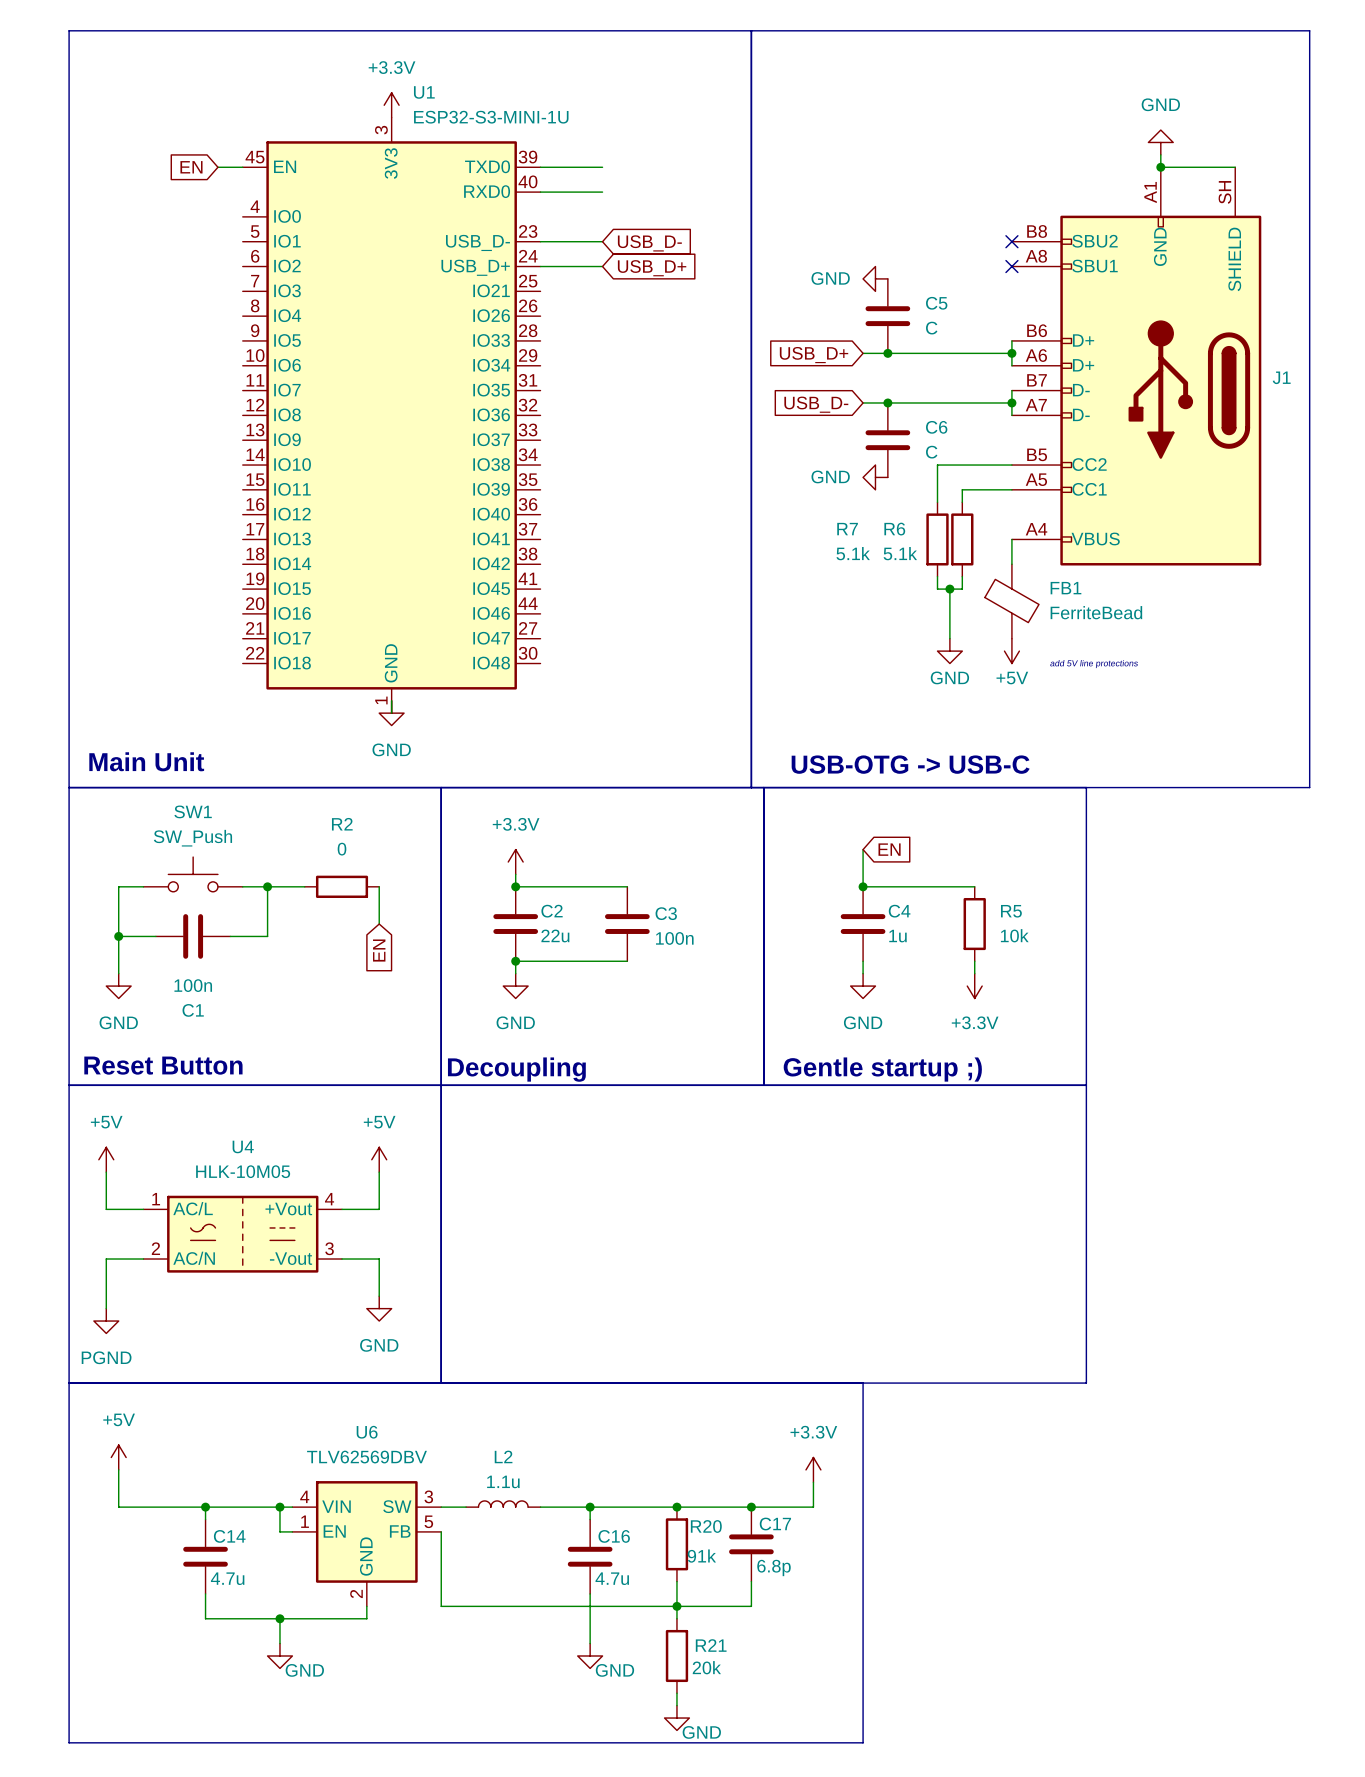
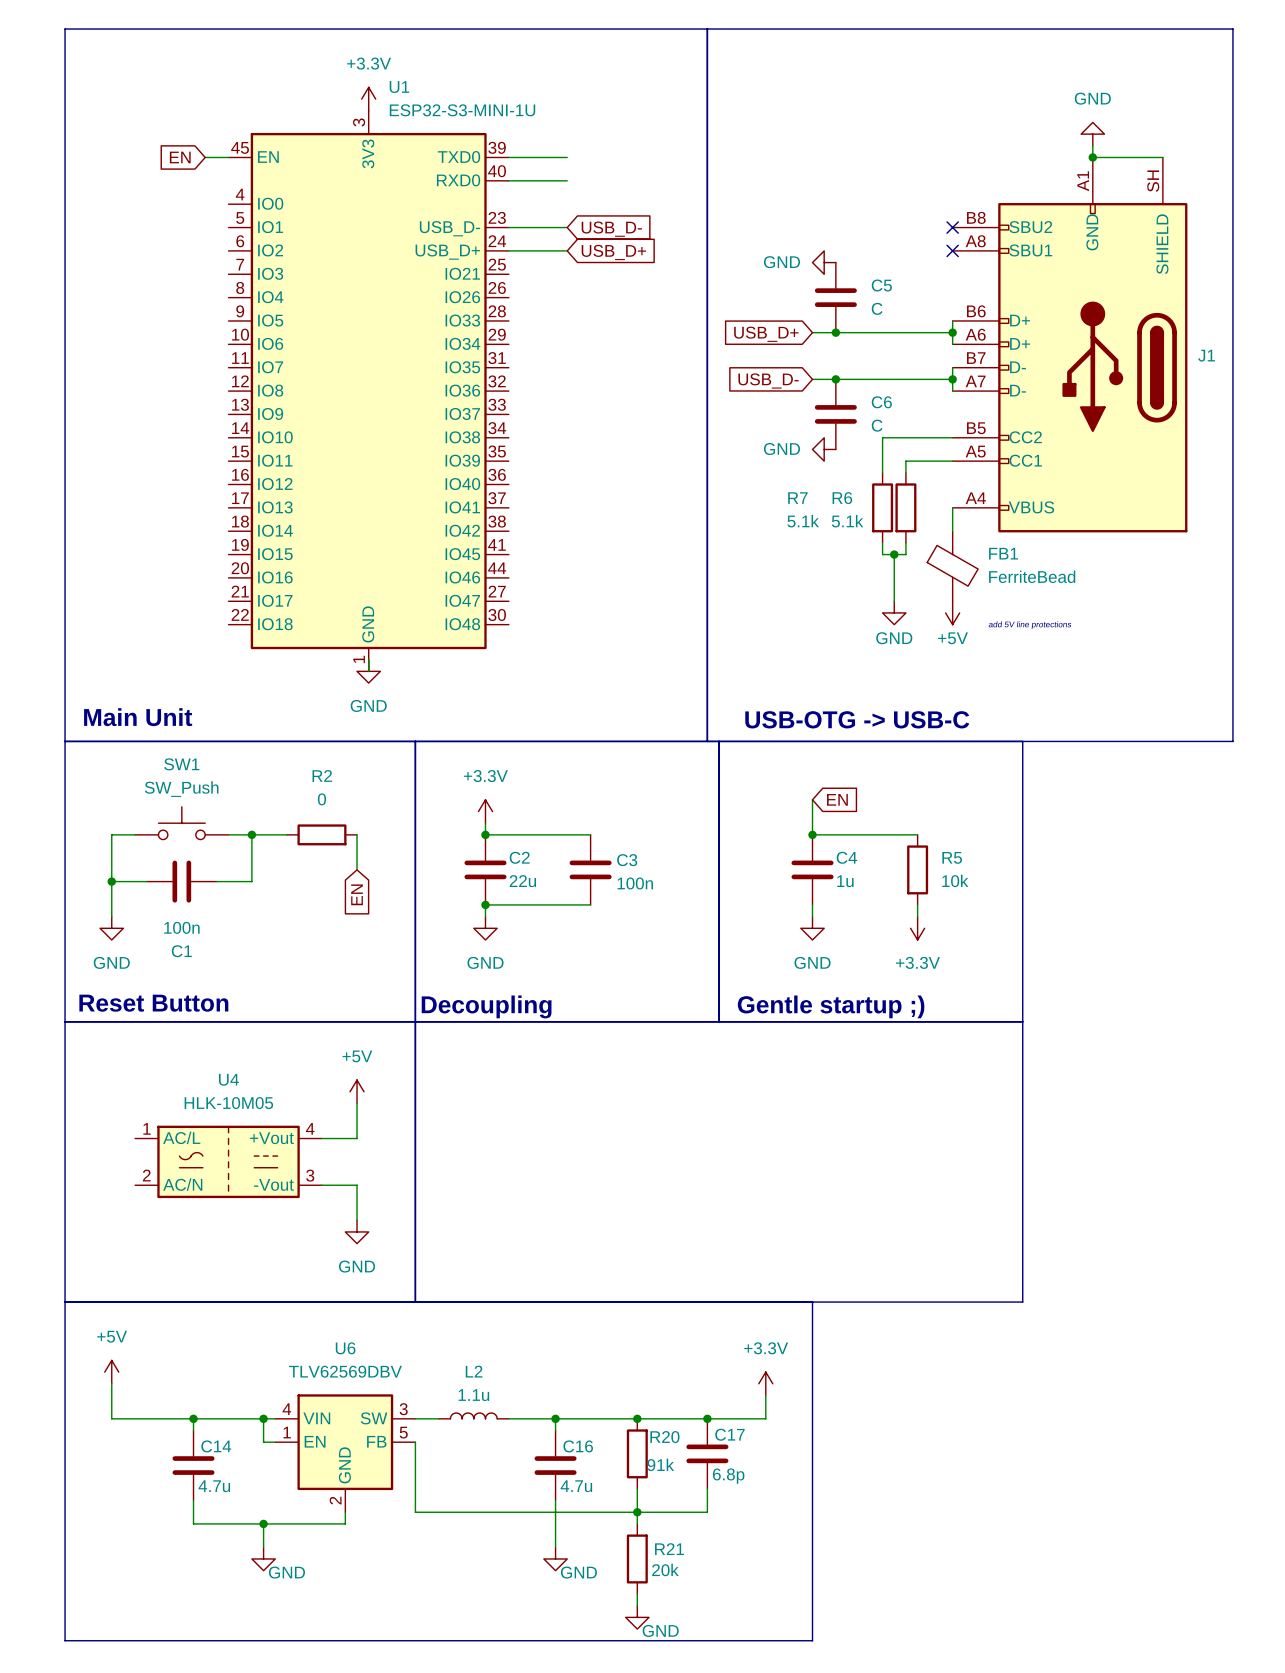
power symbol: +5V (106, 1159) -> none
wire: (106, 1172) (106, 1209) (143, 1209) -> none
wire: (143, 1259) (106, 1259) (106, 1308) -> none
power symbol: PGND (106, 1321) -> none

